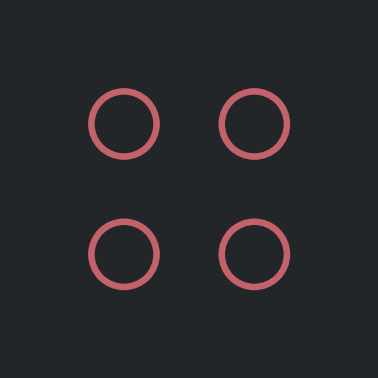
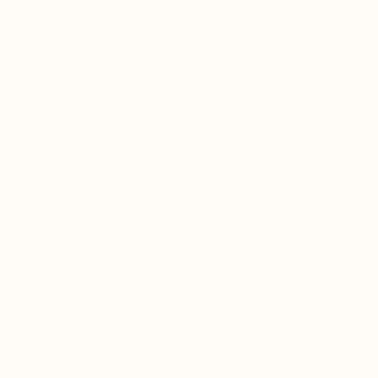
part: (123, 123) -> none
part: (254, 123) -> none
part: (123, 254) -> none
part: (254, 254) -> none

